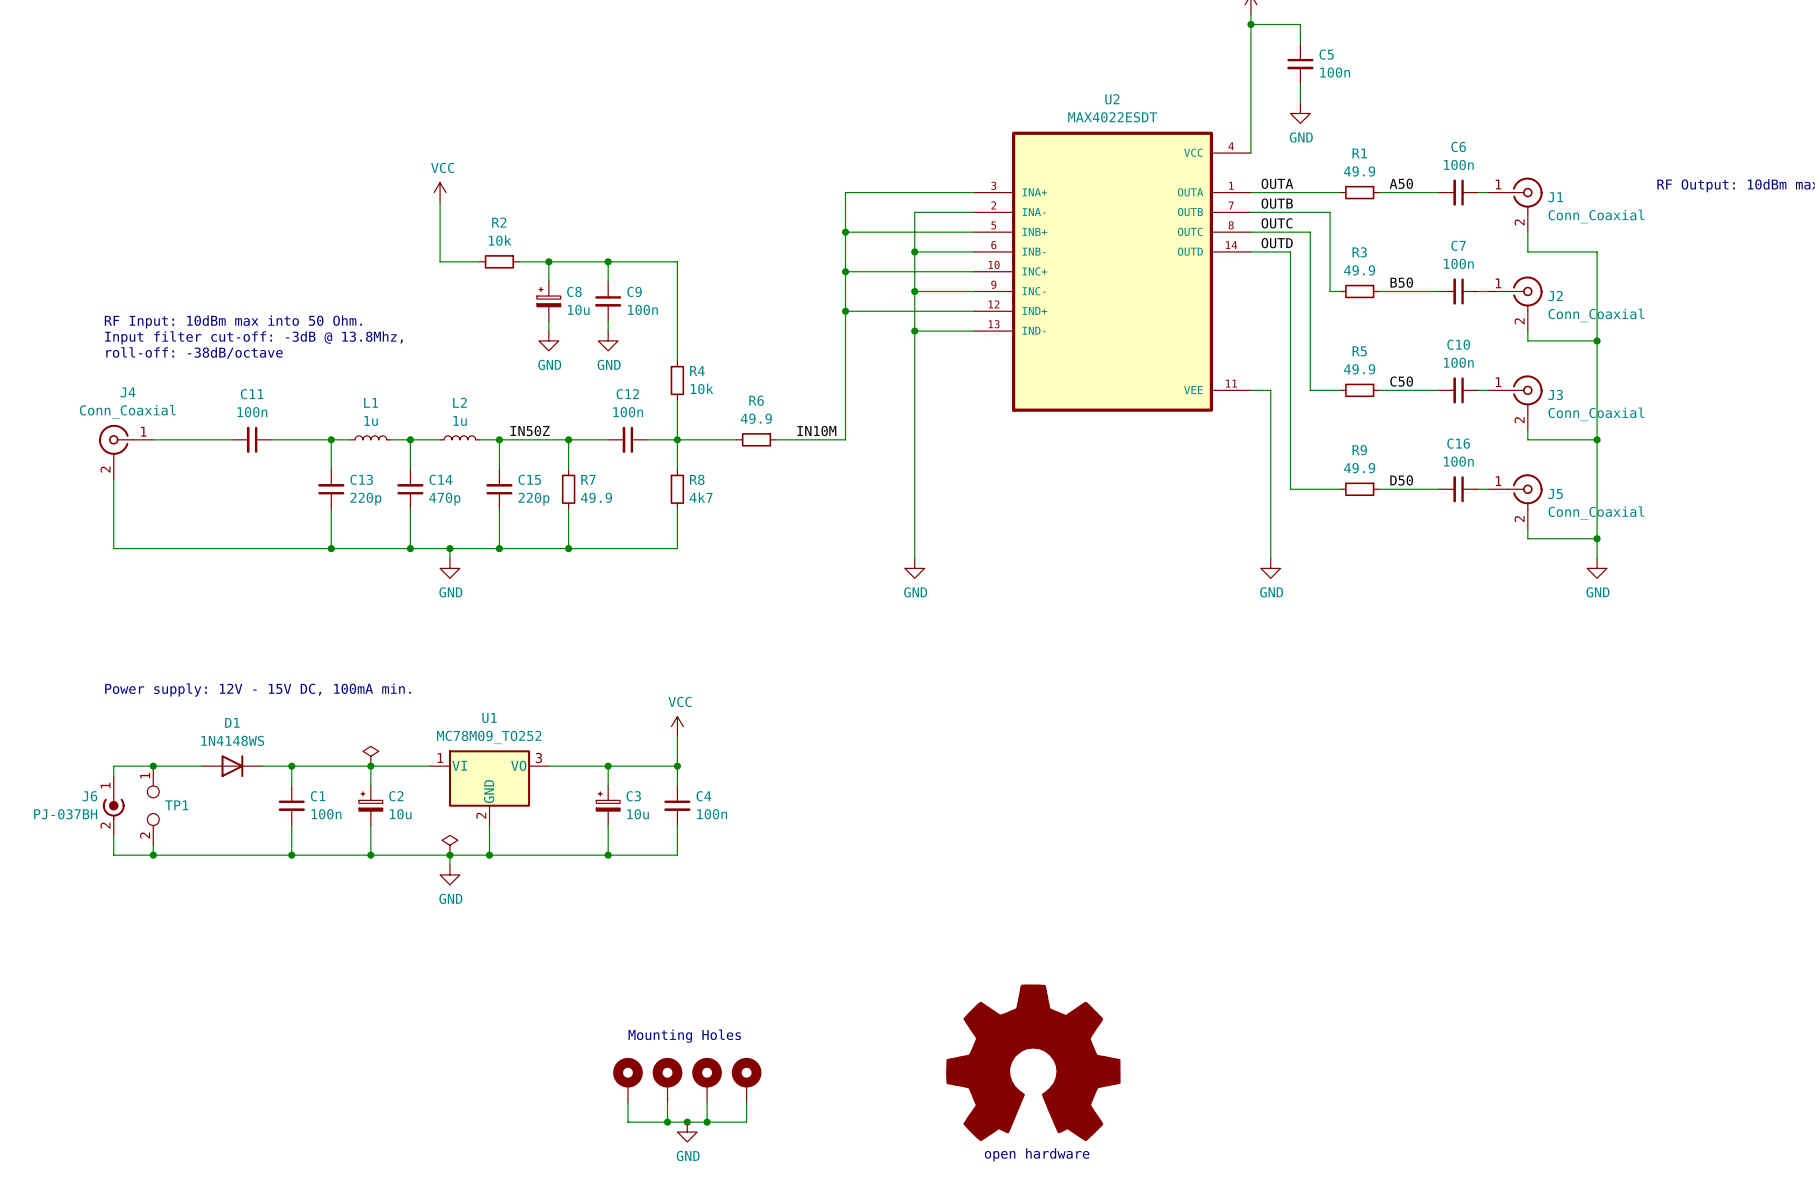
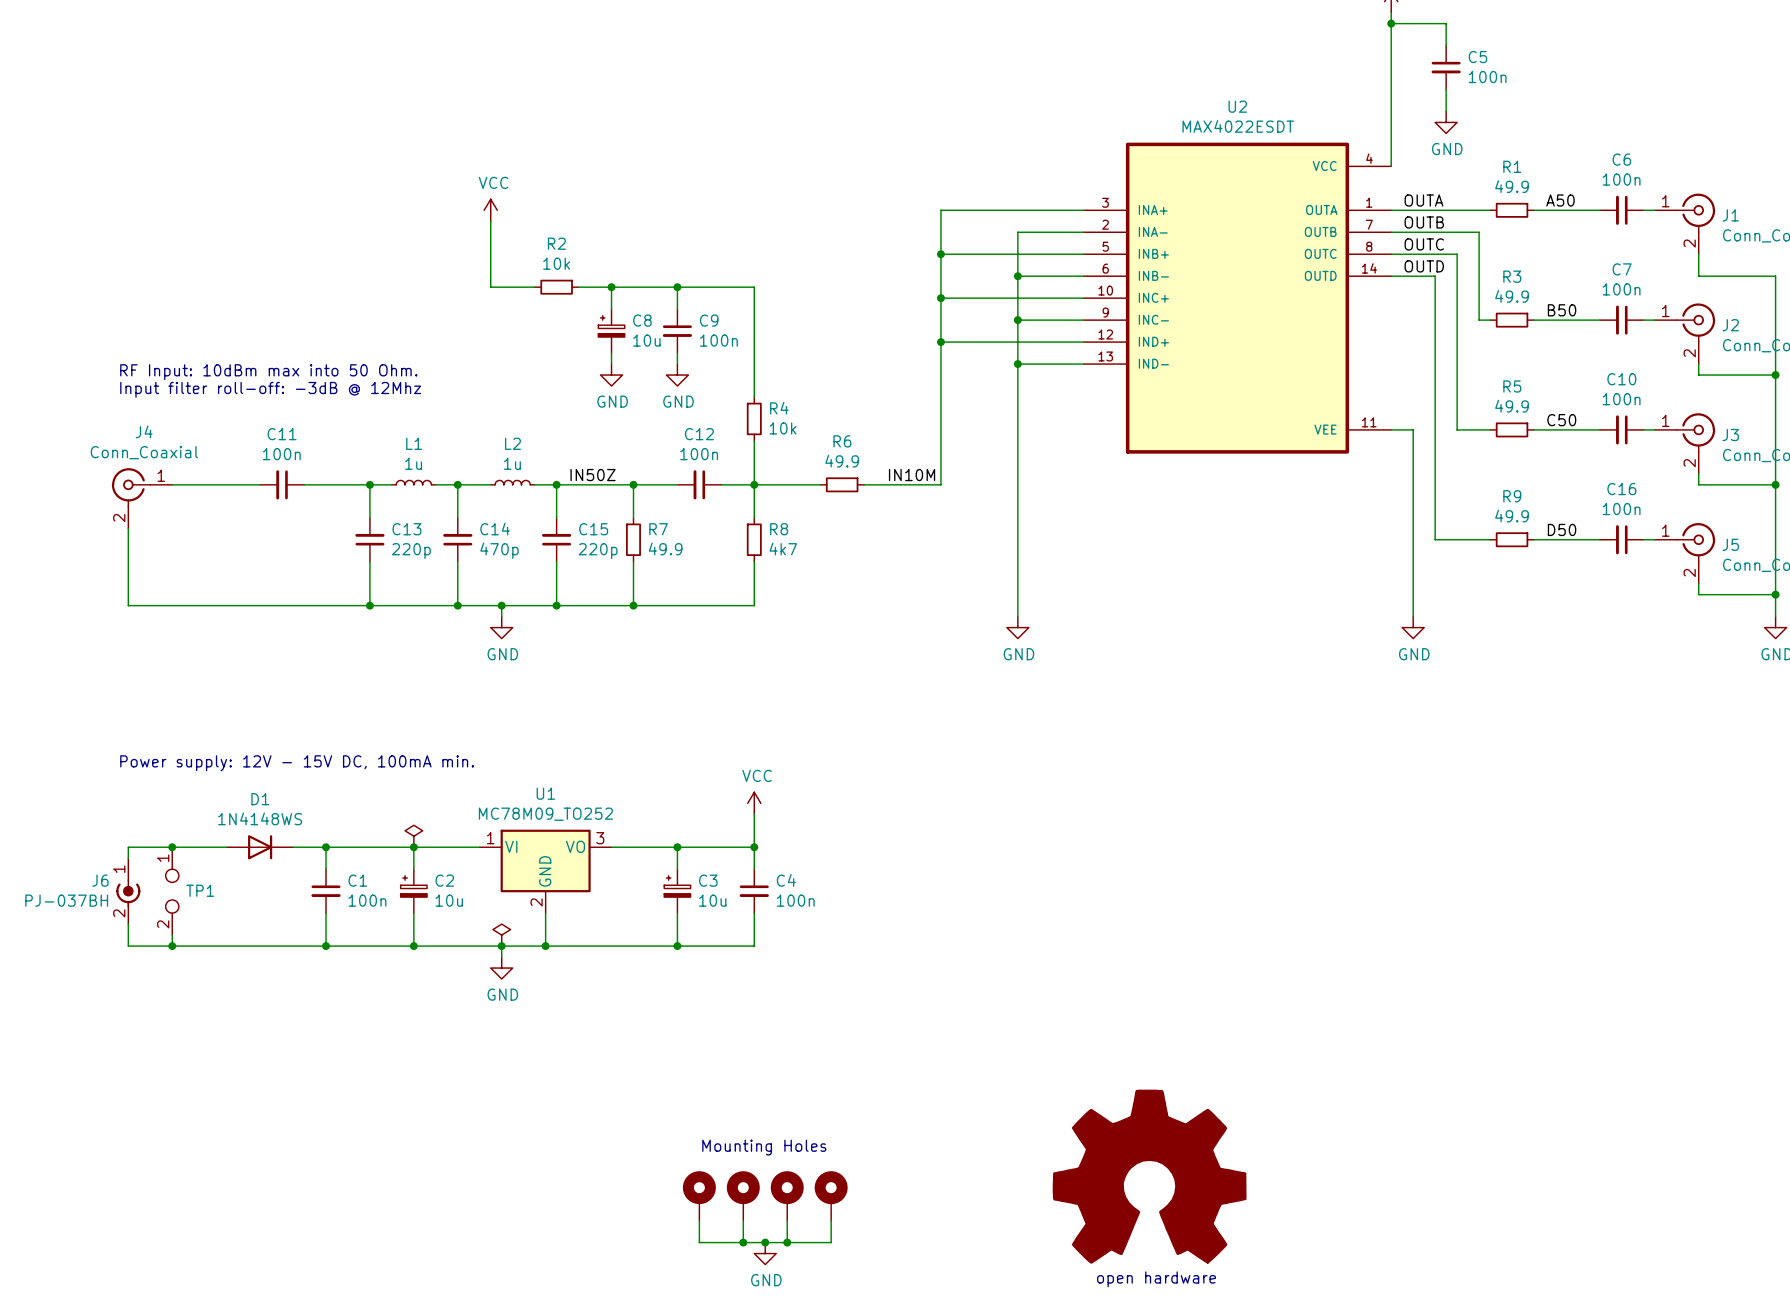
text: RF Input: 10dBm max into 50 Ohm. (233, 321) -> none
text: Input filter cut-off: -3dB @ 13.8Mhz, (254, 337) -> RF Input: 10dBm max into 50 Ohm. (268, 372)
text: roll-off: -38dB/octave (194, 353) -> Input filter roll-off: -3dB @ 12Mhz (270, 389)

